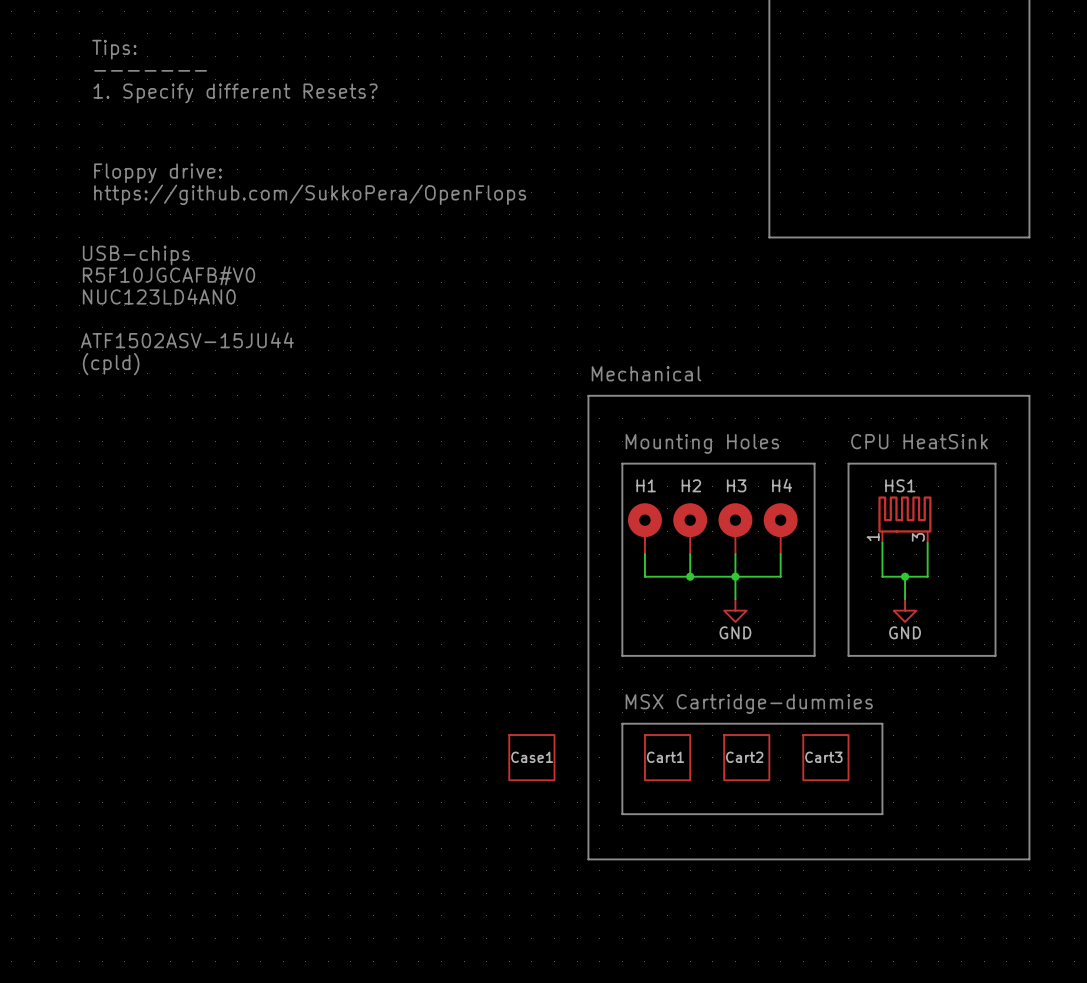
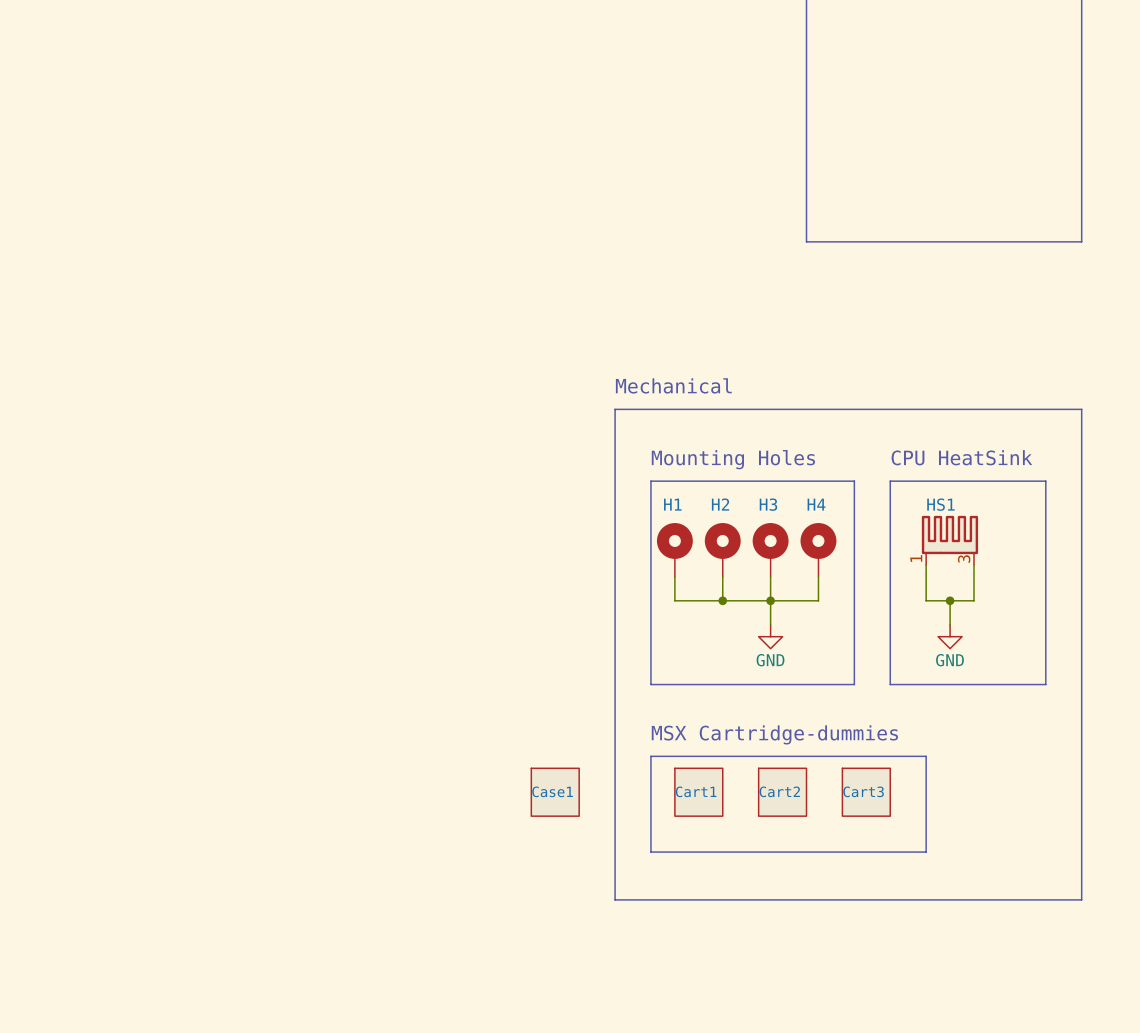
text: Tips: (114, 49) -> none
text: ------- (150, 70) -> none
text: 1. Specify different Resets? (235, 93) -> none
text: Floppy drive: (158, 173) -> none
text: https://github.com/SukkoPera/OpenFlops (310, 194) -> none
text: USB-chips (136, 255) -> none
text: R5F10JGCAFB#V0 (168, 275) -> none
text: NUC123LD4AN0 (159, 296) -> none
text: ATF1502ASV-15JU44 (187, 340) -> none
text: (cpld) (111, 364) -> none

